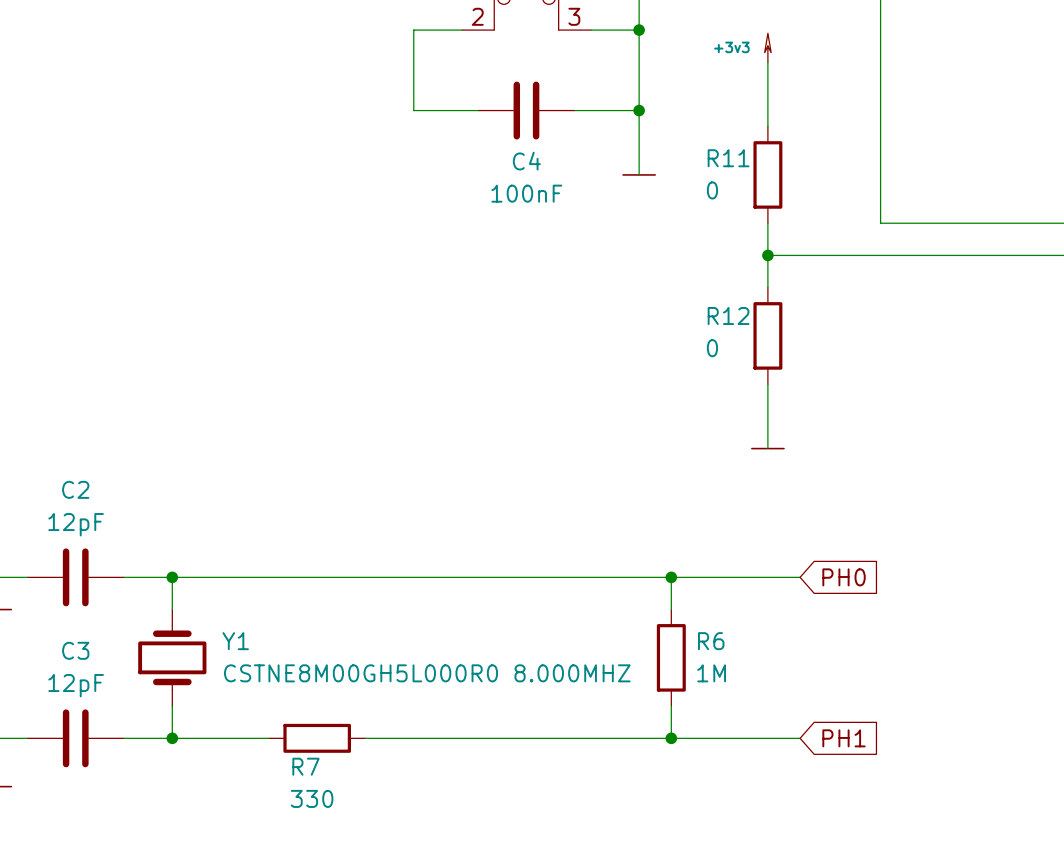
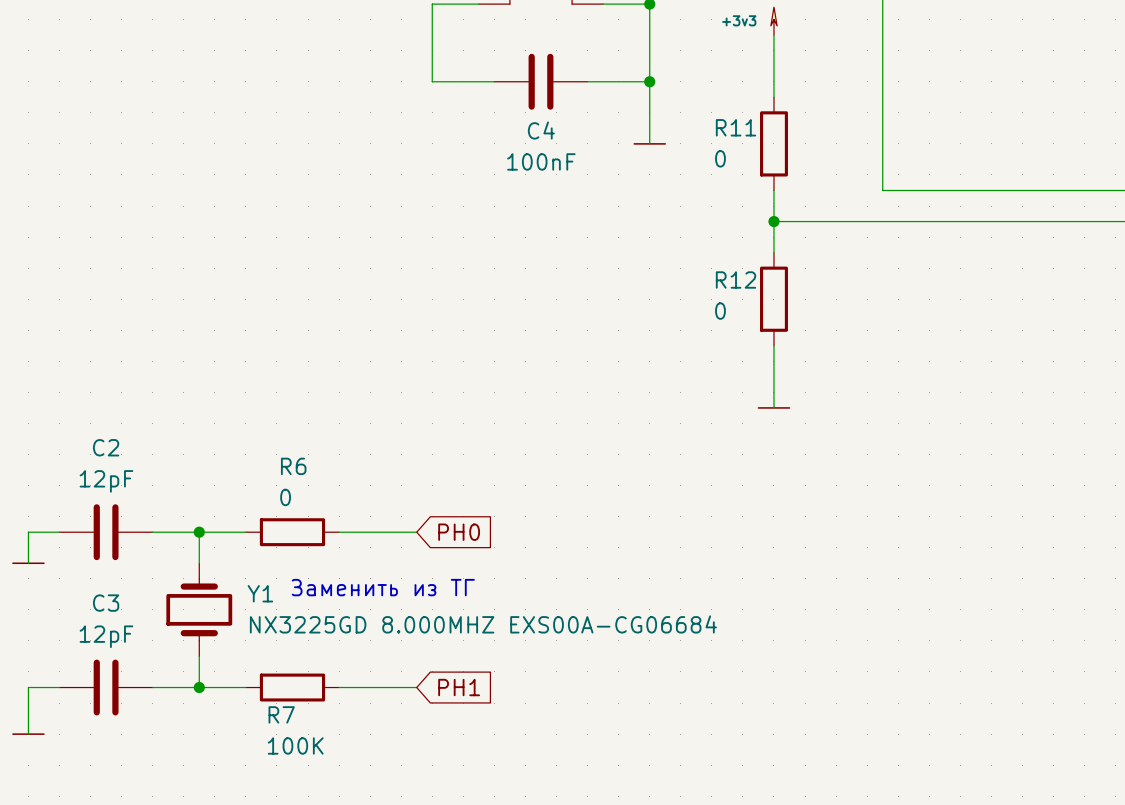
wire: (220, 577) (317, 577) -> none
wire: (397, 577) (800, 577) -> none
global label: none -> PH0 (459, 532)
wire: (671, 577) (671, 609) -> none
junction: (671, 577) -> none
global label: PH0 (844, 577) -> none
text: none -> Заменить из ТГ (383, 587)
R6 name position: R6 (711, 641) -> R6 (293, 466)
R6 rotation: 0° (671, 657) -> 90° clockwise (292, 532)
R6 position: (671, 657) -> (292, 532)
Y1 value: CSTNE8M00GH5L000R0 8.000MHZ (427, 673) -> NX3225GD 8.000MHZ EXS00A-CG06684 (483, 624)
R6 value: 1М (711, 673) -> 0 (285, 497)
wire: (671, 706) (671, 738) -> none
wire: (220, 738) (268, 738) -> (339, 687) (385, 687)
R7 position: (317, 738) -> (292, 687)
wire: (397, 738) (800, 738) -> none
global label: none -> PH1 (459, 687)
junction: (671, 738) -> none
global label: PH1 (844, 738) -> none
R7 value: 330 (312, 798) -> 100K (295, 745)

